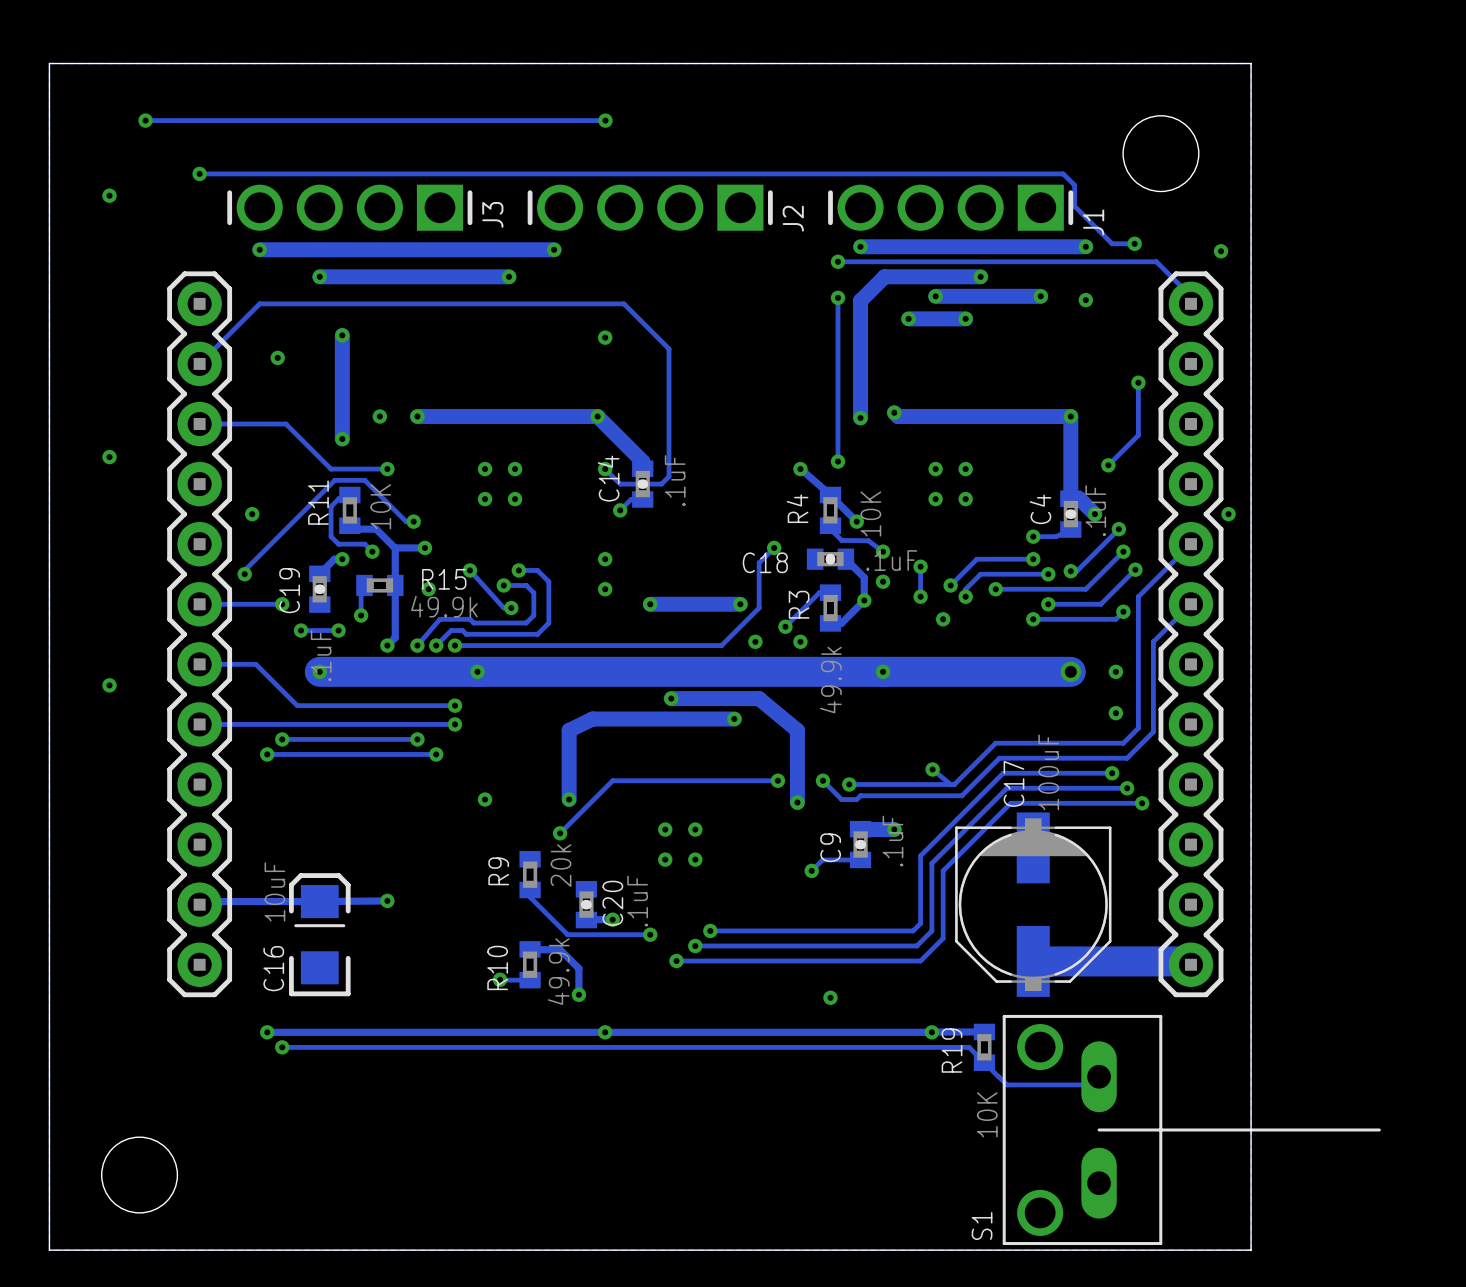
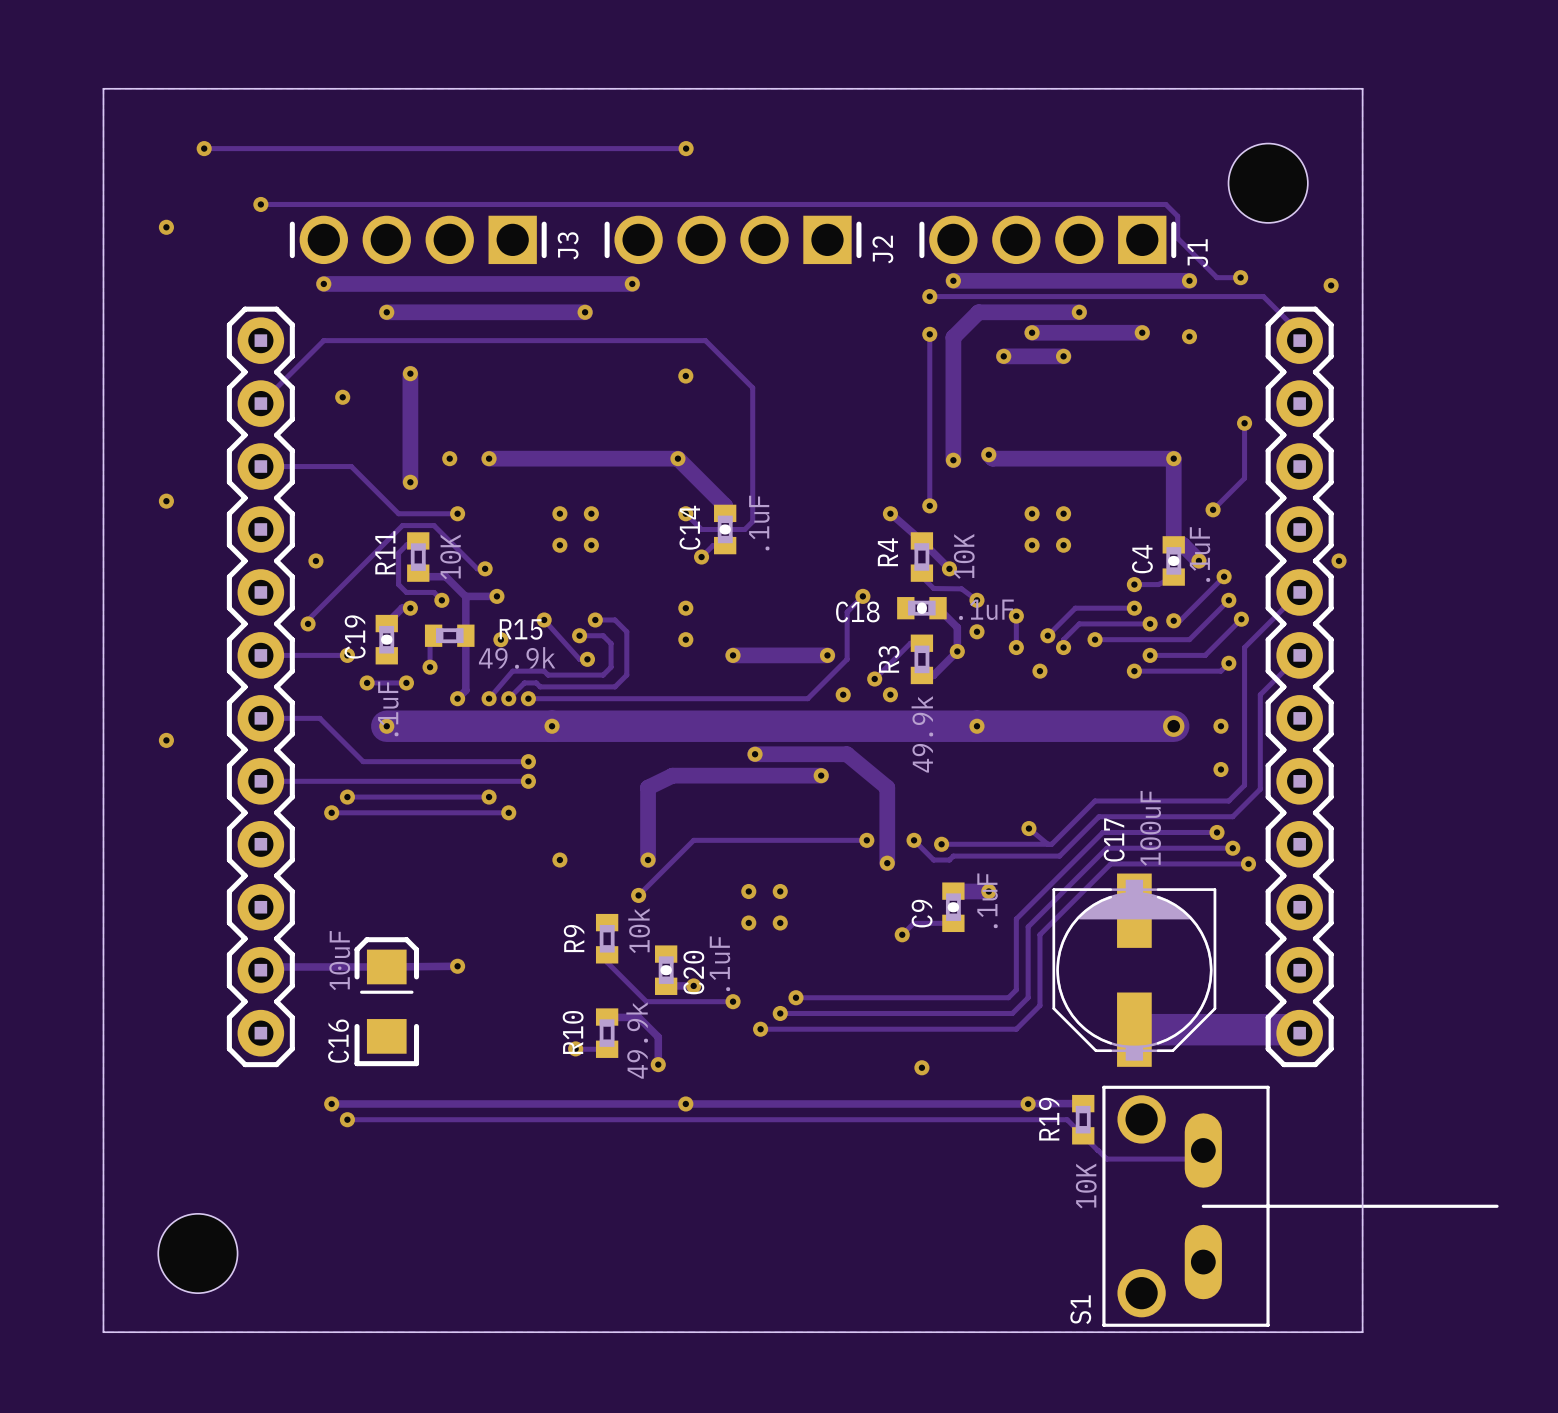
R9 value: 20k (561, 865) -> 10k (639, 930)

